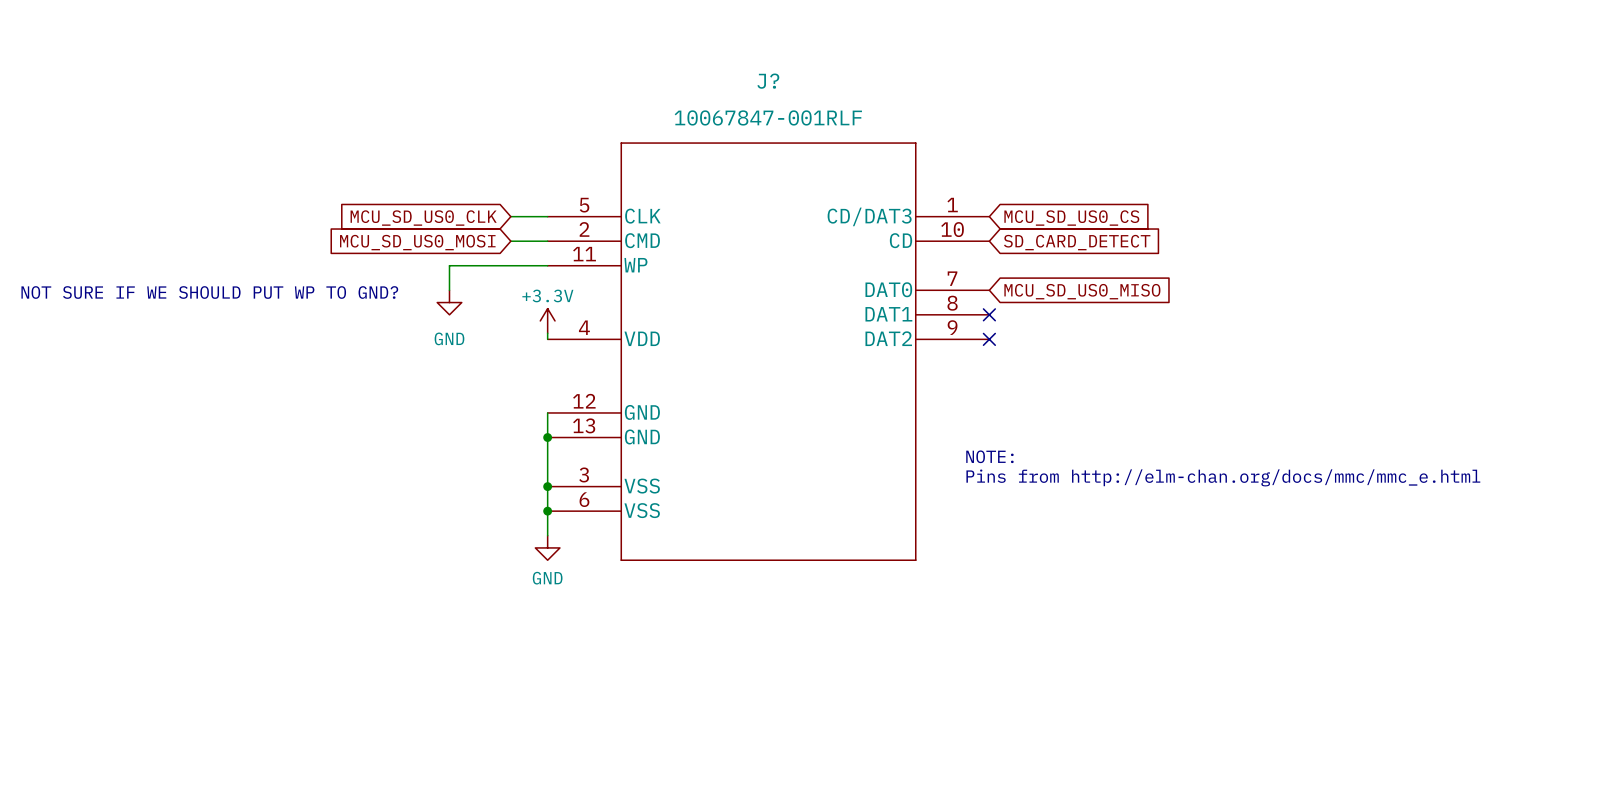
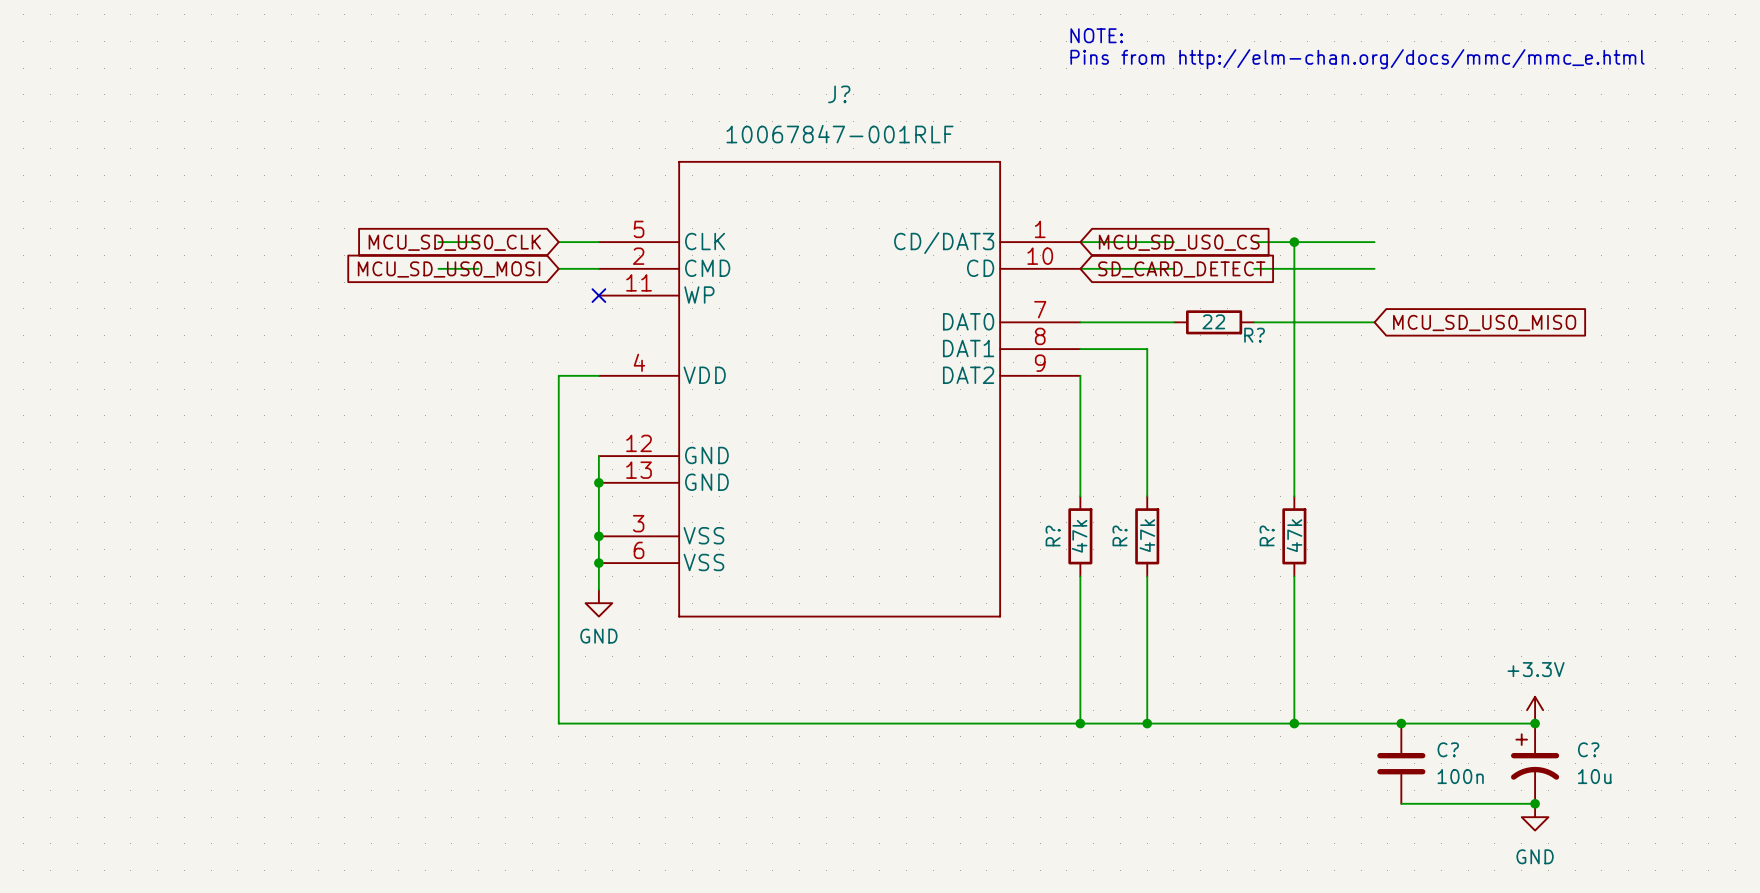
text: none -> NOTE: (1096, 35)
text: none -> Pins from http://elm-chan.org/docs/mmc/mmc_e.html (1357, 59)
wire: none -> (438, 242) (478, 242)
wire: none -> (1080, 242) (1173, 242)
wire: none -> (1254, 242) (1374, 242)
wire: none -> (1294, 242) (1294, 496)
junction: none -> (1294, 242)
wire: none -> (438, 268) (478, 268)
wire: none -> (1080, 268) (1173, 268)
wire: none -> (1254, 268) (1374, 268)
wire: (547, 265) (449, 265) (449, 290) -> none
no-connect mark: none -> (598, 295)
wire: none -> (1080, 322) (1173, 322)
R?: none -> 22 (1214, 322)
wire: none -> (1254, 322) (1374, 322)
global label: MCU_SD_US0_MISO (1082, 291) -> none
global label: none -> MCU_SD_US0_MISO (1484, 322)
text: NOT SURE IF WE SHOULD PUT WP TO GND? (209, 292) -> none
power symbol: GND (449, 302) -> none
wire: none -> (1080, 349) (1147, 349) (1147, 496)
no-connect mark: (989, 314) -> none
power symbol: +3.3V (547, 320) -> none
wire: (547, 333) (547, 339) -> (1535, 723) (558, 723) (558, 375) (598, 375)
wire: none -> (1080, 375) (1080, 496)
no-connect mark: (989, 339) -> none
text: NOTE: (989, 456) -> none
text: Pins from http://elm-chan.org/docs/mmc/mmc_e.html (1223, 477) -> none
R?: none -> 47k (1080, 536)
R?: none -> 47k (1147, 536)
R?: none -> 47k (1294, 536)
wire: none -> (1080, 576) (1080, 723)
wire: none -> (1147, 576) (1147, 723)
wire: none -> (1294, 576) (1294, 723)
power symbol: none -> +3.3V (1535, 710)
junction: none -> (1080, 723)
junction: none -> (1147, 723)
junction: none -> (1294, 723)
junction: none -> (1401, 723)
junction: none -> (1535, 723)
C?: none -> 100n (1401, 763)
C?: none -> 10u (1535, 763)
wire: none -> (1401, 803) (1535, 803)
junction: none -> (1535, 803)
power symbol: none -> GND (1535, 817)

